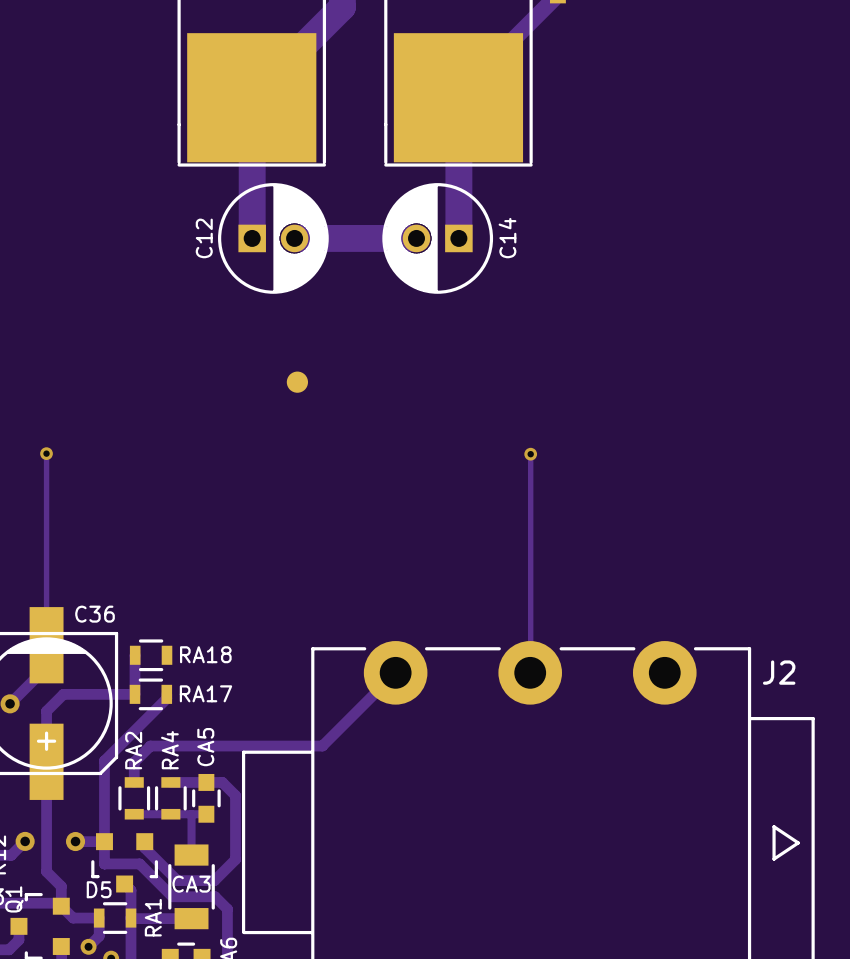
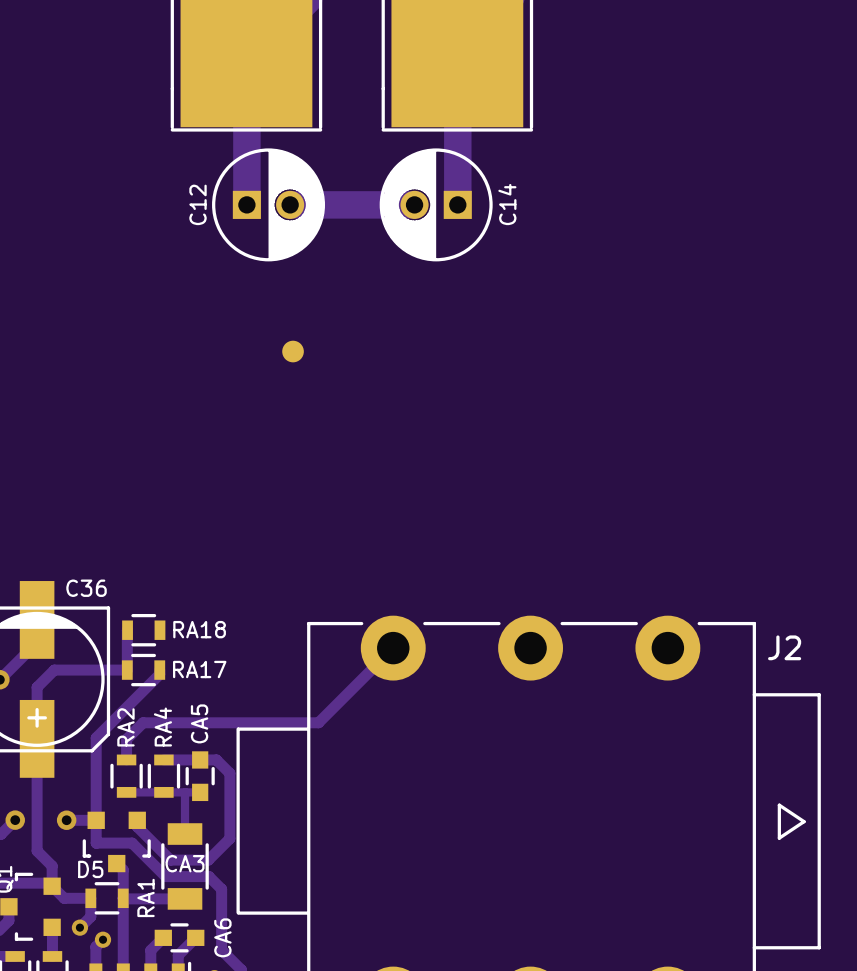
track: (46, 453) (46, 645) -> none
via: (46, 453) -> none
track: (530, 454) (530, 672) -> none
via: (530, 454) -> none

